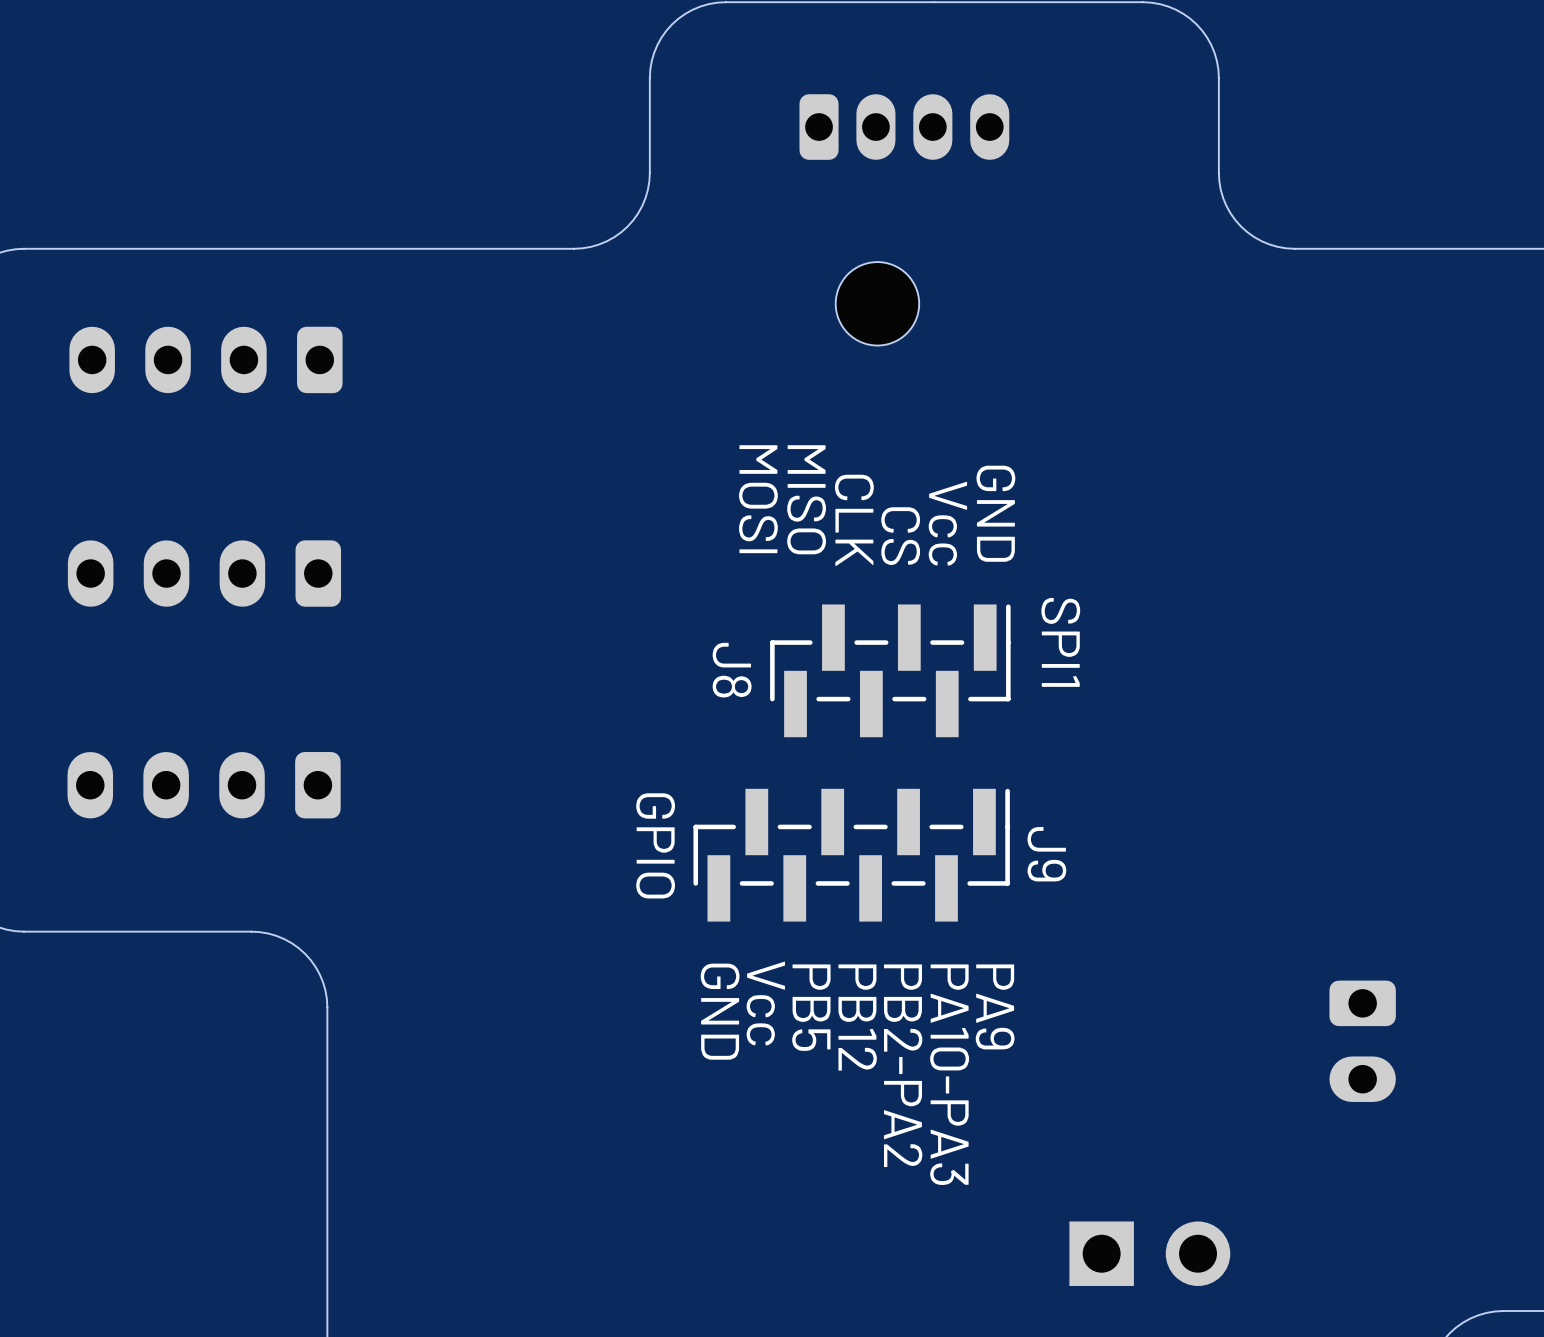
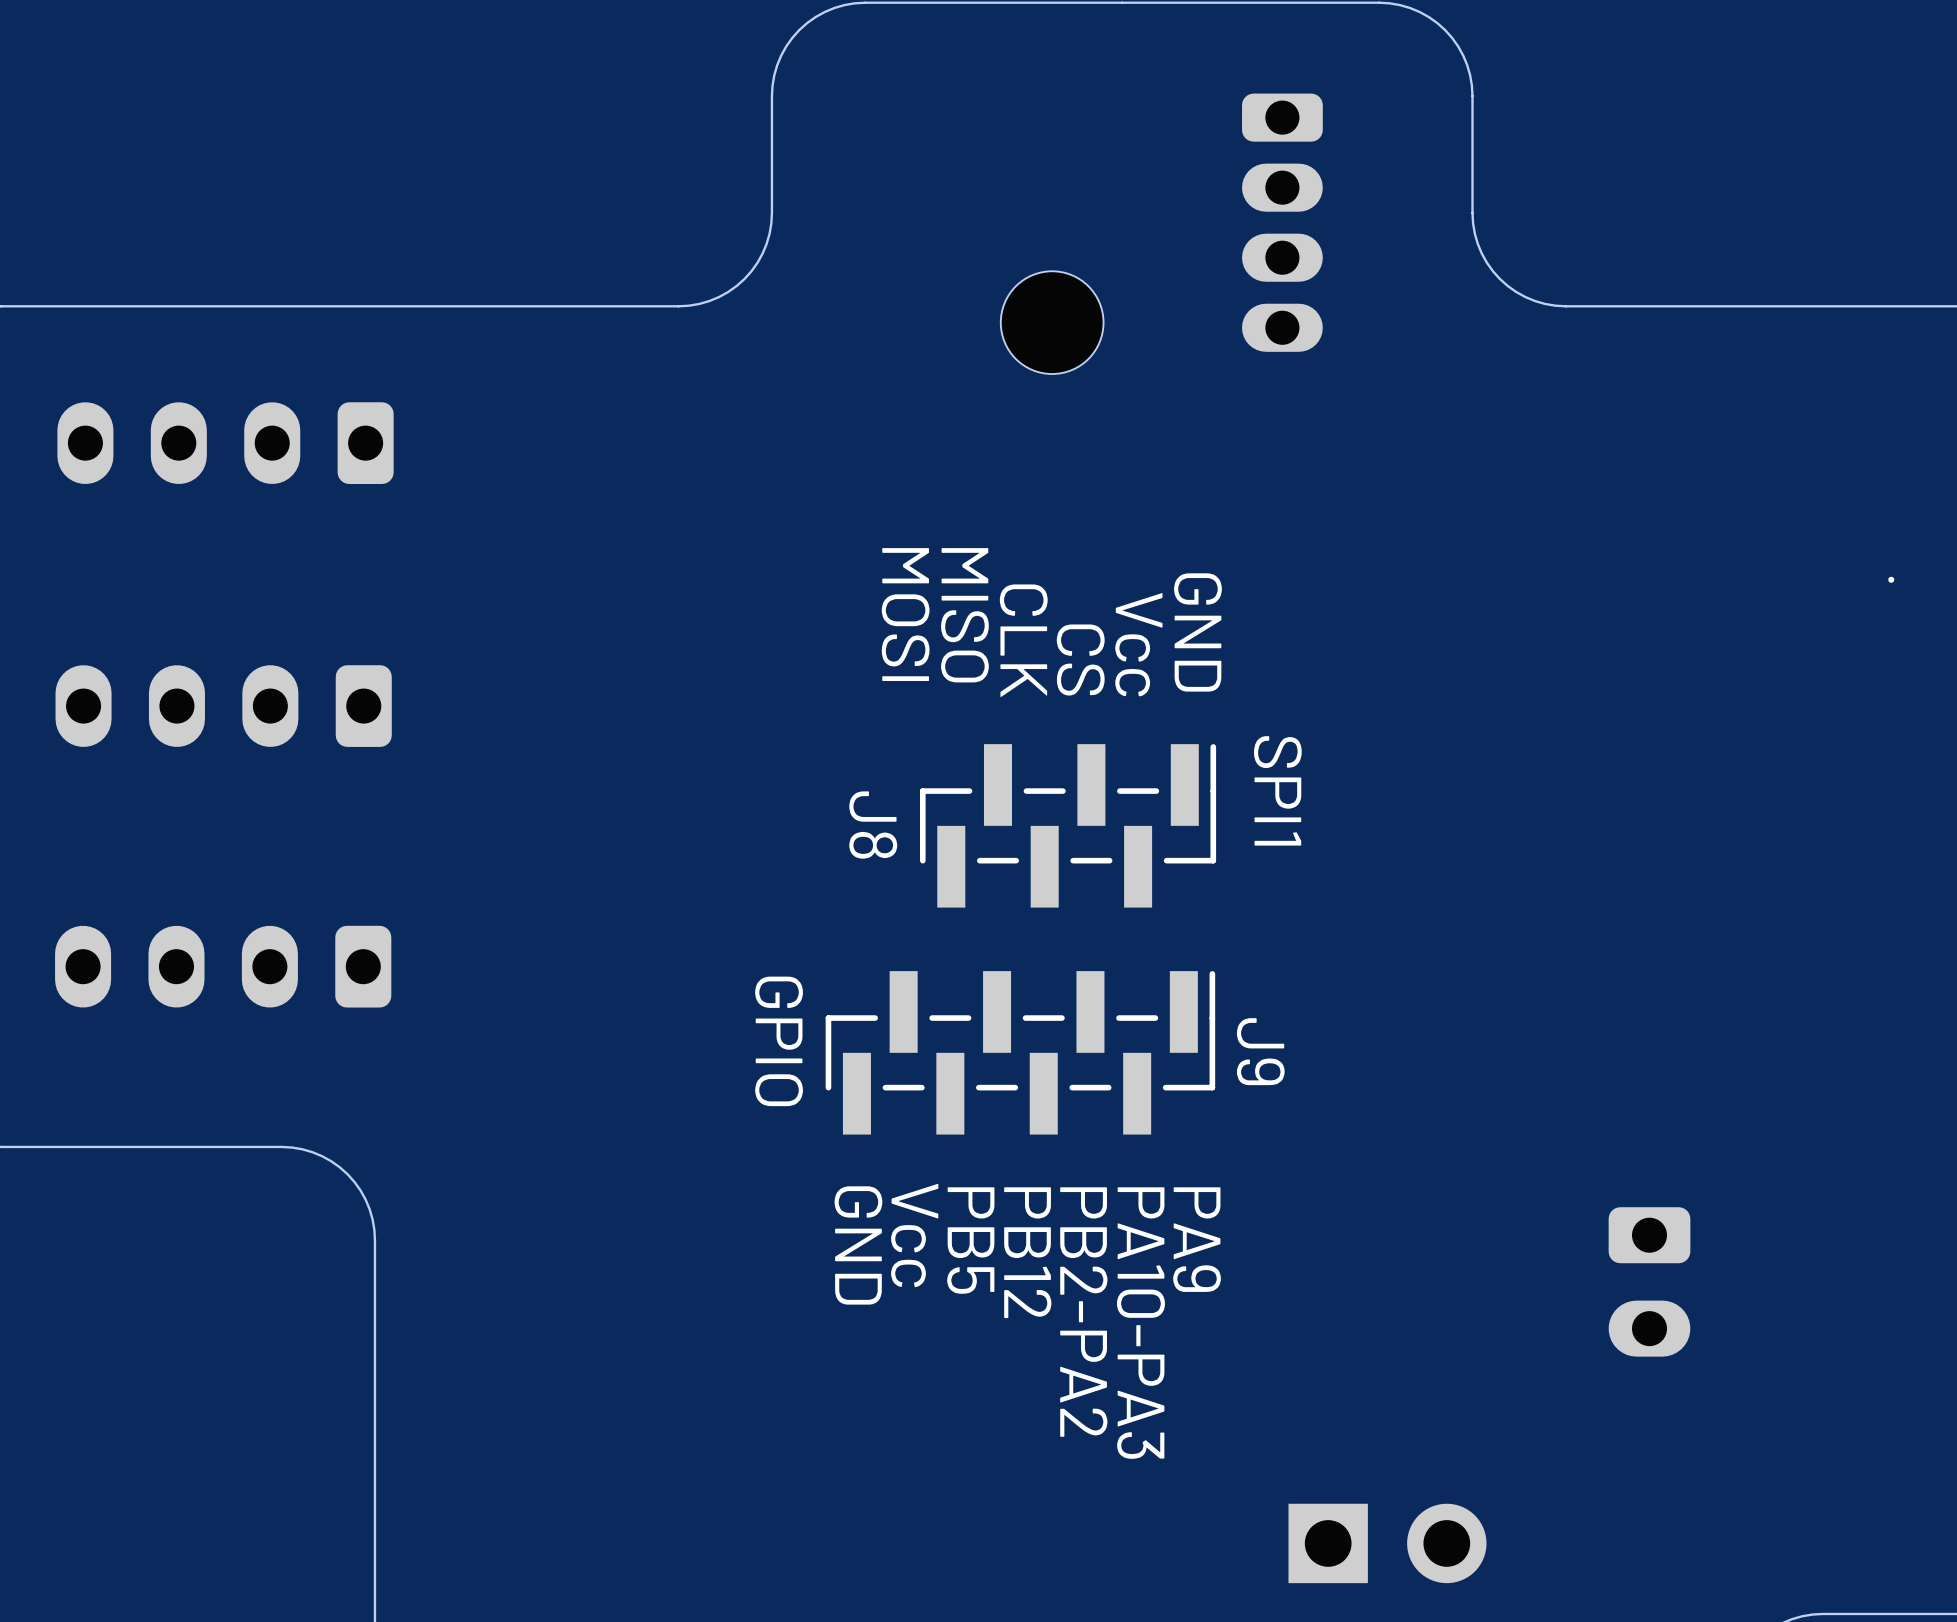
part rotation: 0° (904, 127) -> 90° clockwise (1282, 222)
part position: (904, 127) -> (1282, 222)
part position: (877, 303) -> (1052, 322)

